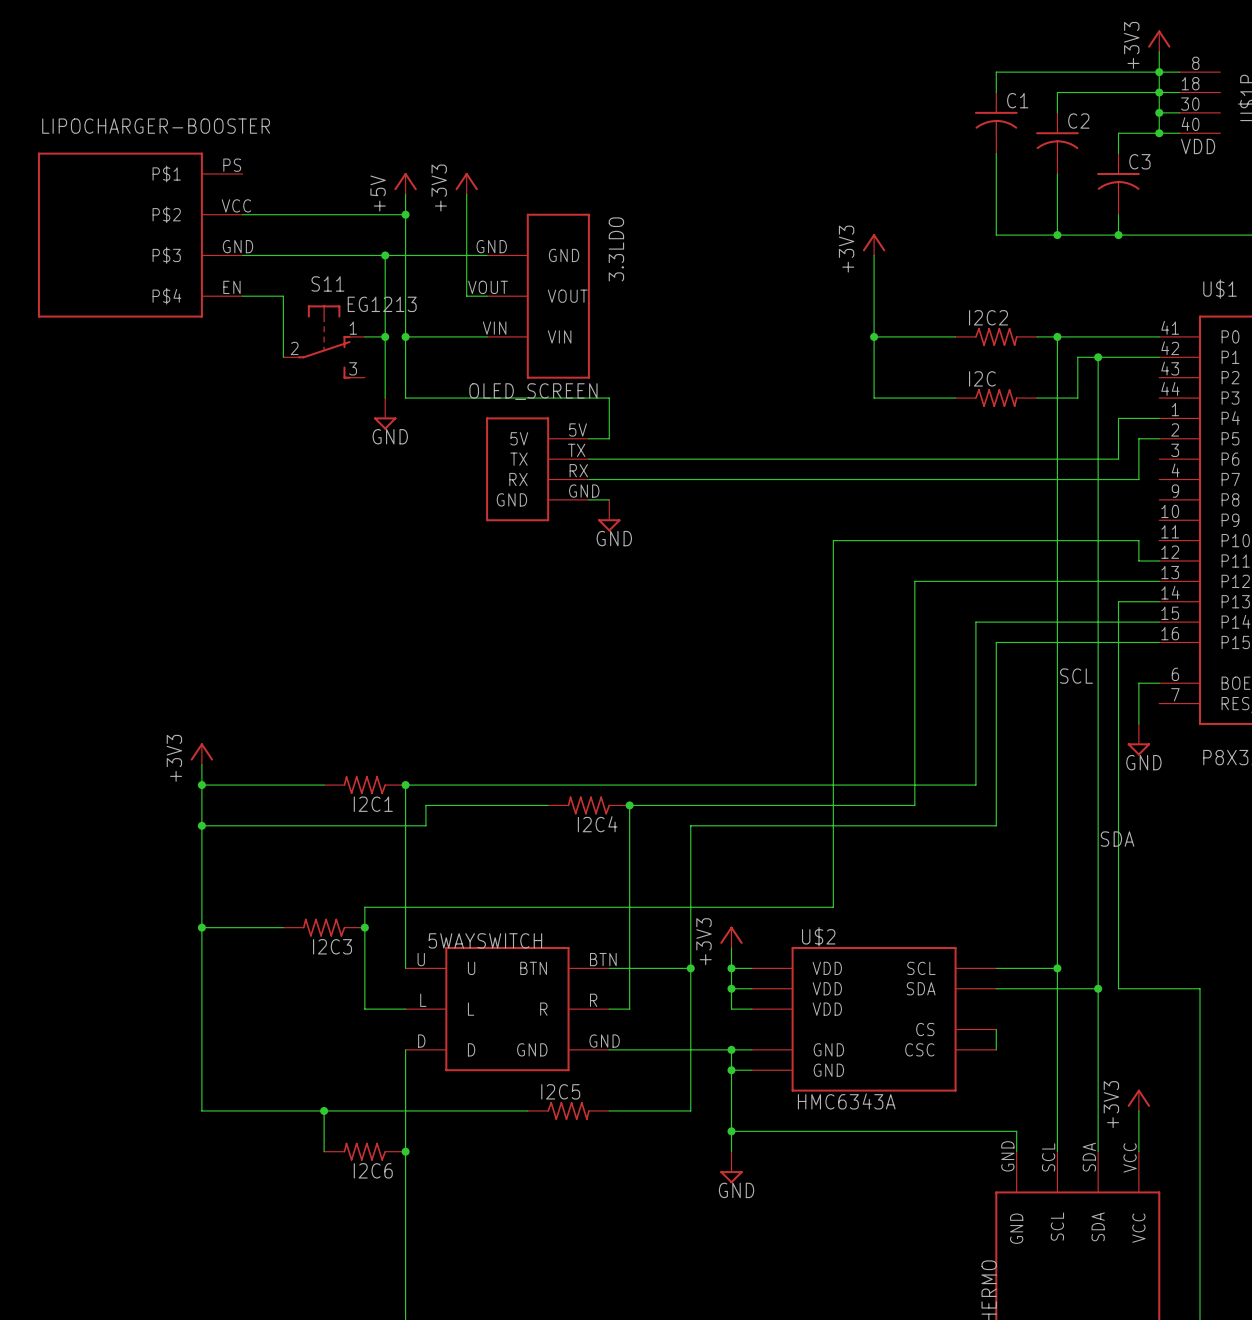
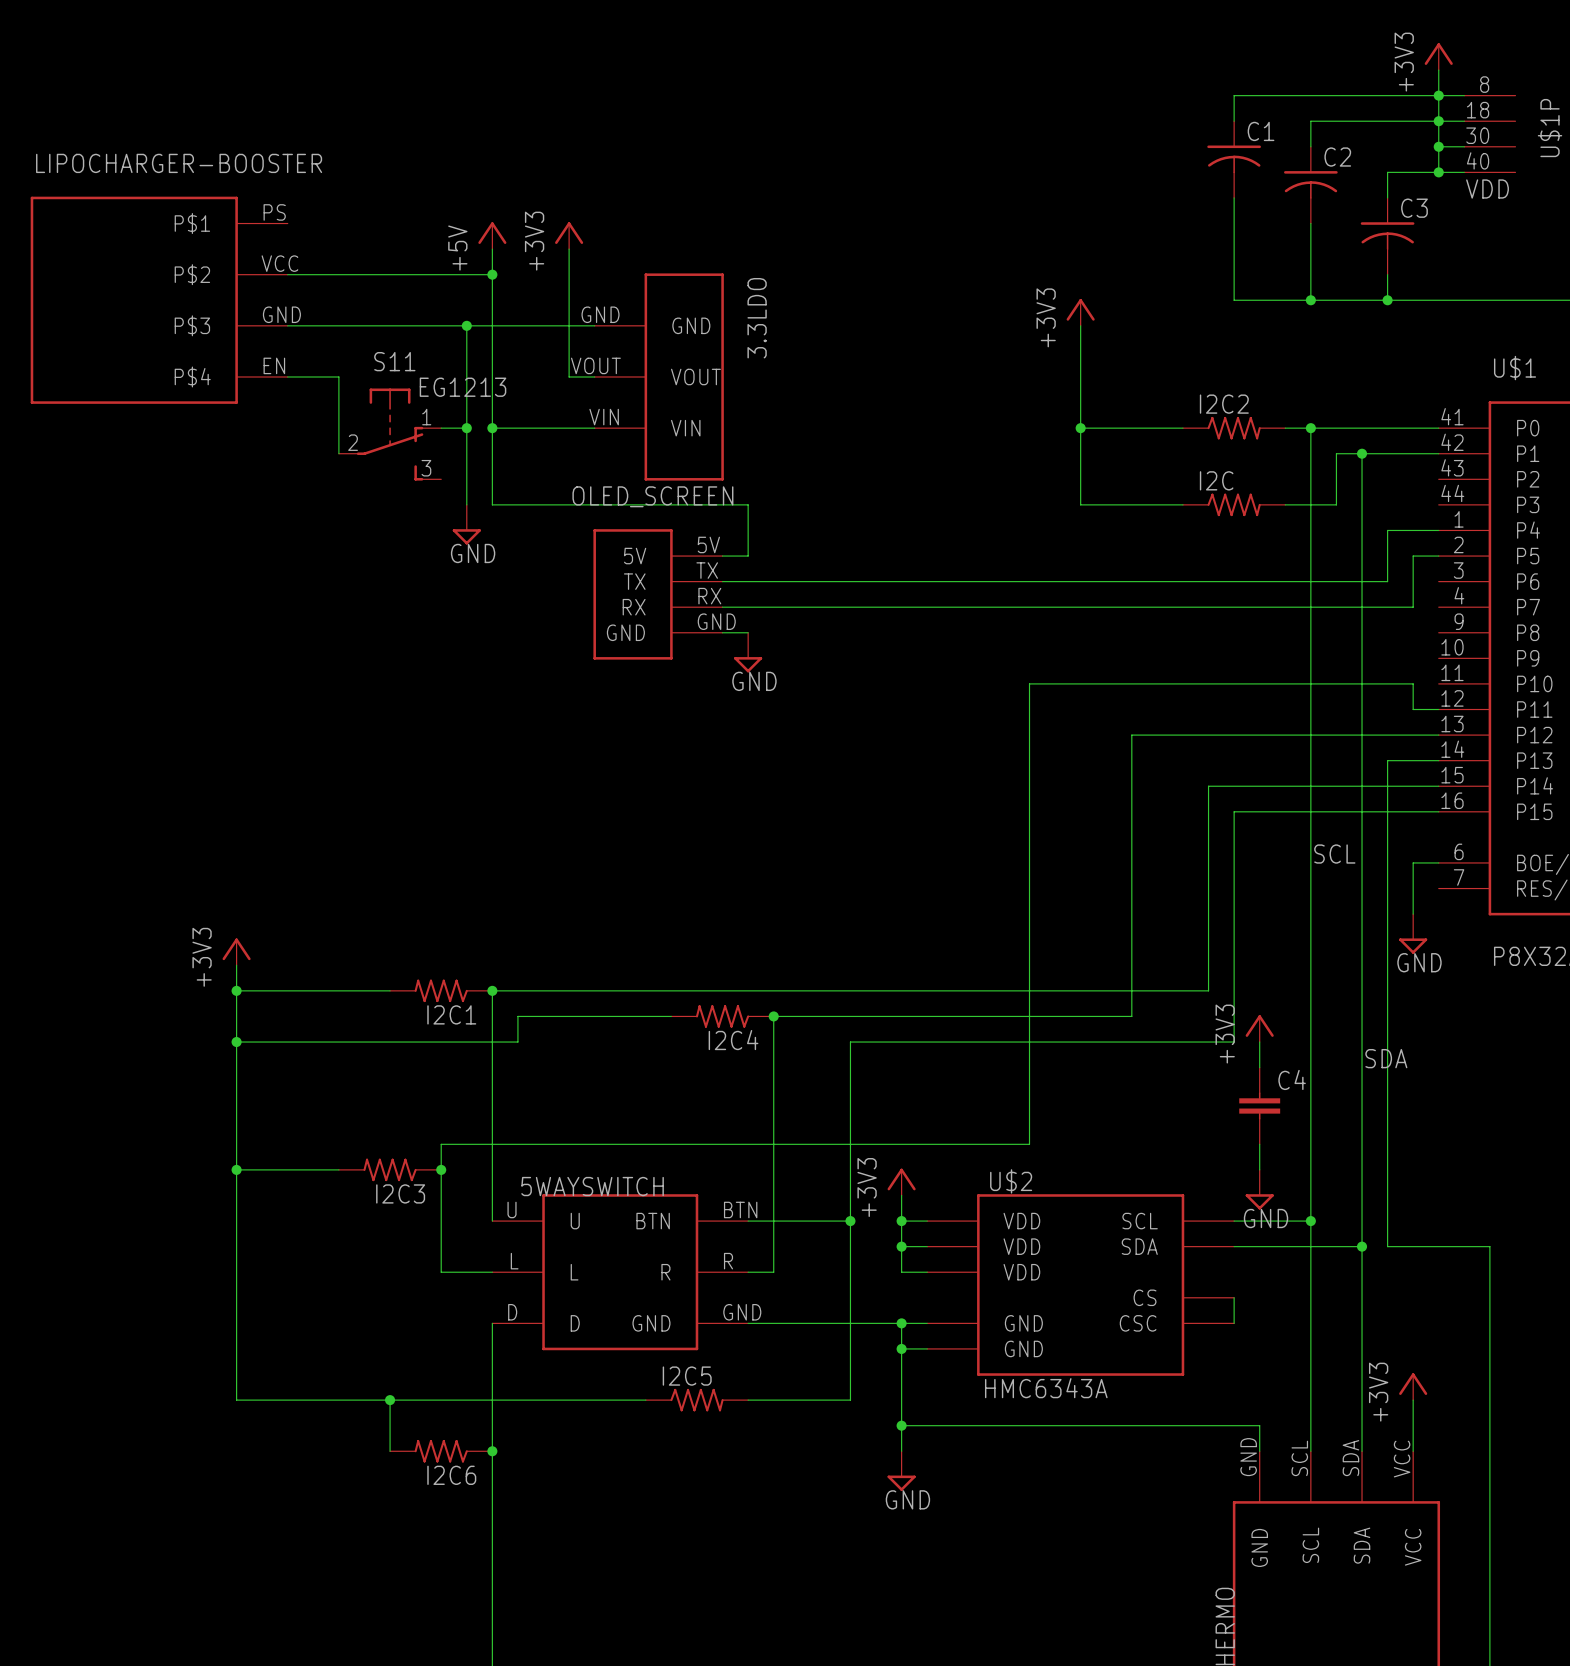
power symbol: none -> +3V3 (1259, 1028)
wire: none -> (1259, 1042) (1259, 1067)
C4: none -> (1259, 1105)
wire: none -> (1259, 1144) (1259, 1169)
power symbol: none -> GND (1259, 1189)

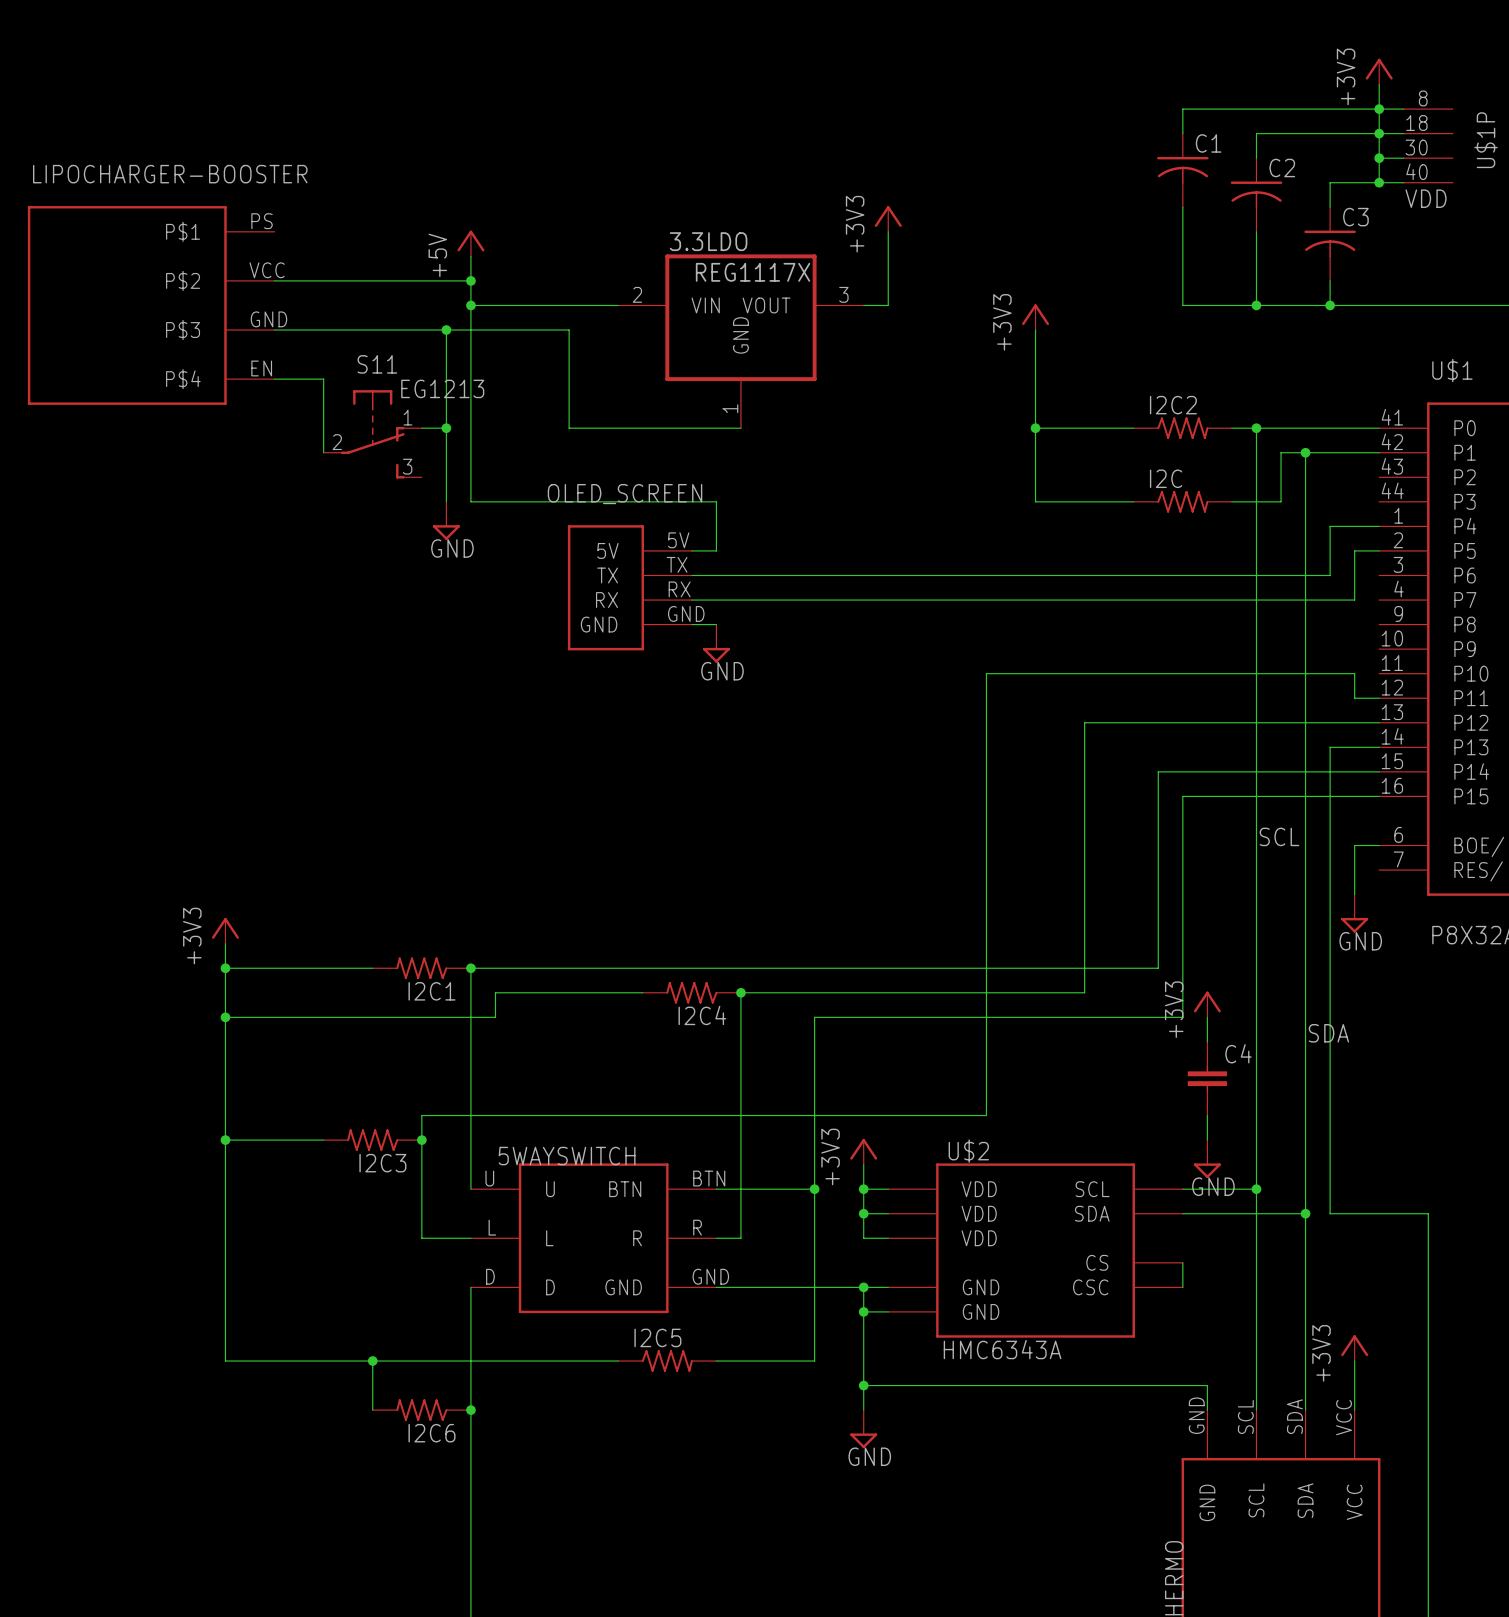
power symbol: none -> +3V3 (888, 218)
wire: none -> (888, 231) (888, 305) (863, 305)
power symbol: +3V3 (569, 235) -> none
wire: (569, 249) (569, 376) (594, 376) -> none
3.3LDO value: none -> REG1117X (753, 272)
3.3LDO symbol: [594, 273, 724, 481] -> [618, 254, 864, 429]
wire: none -> (470, 305) (618, 305)
junction: none -> (470, 305)
3.3LDO name position: 3.3LDO (757, 318) -> 3.3LDO (708, 241)
wire: none -> (569, 330) (569, 428) (740, 428)
wire: (492, 428) (594, 428) -> none
junction: (492, 428) -> none

